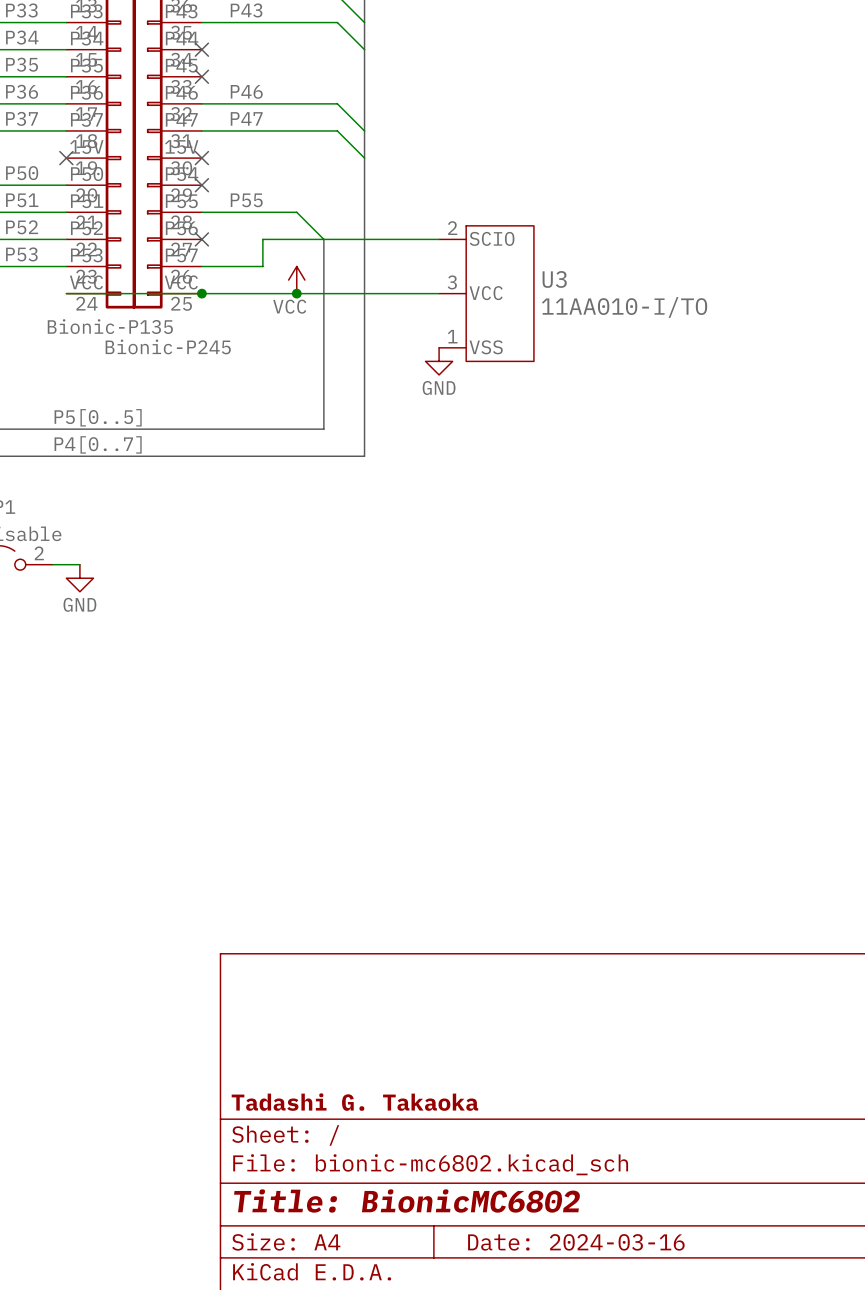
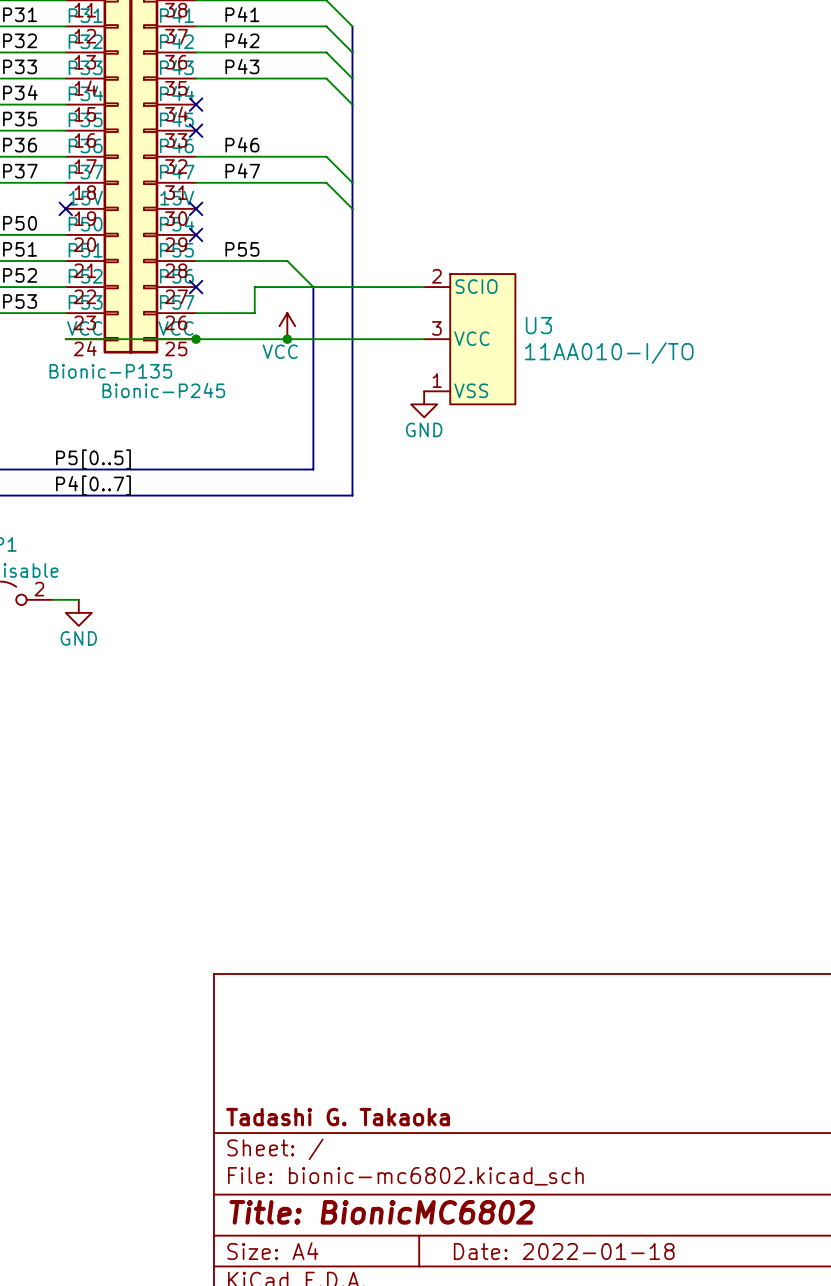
title block: Date: 2024-03-16 (576, 1242) -> Date: 2022-01-18 (564, 1251)

